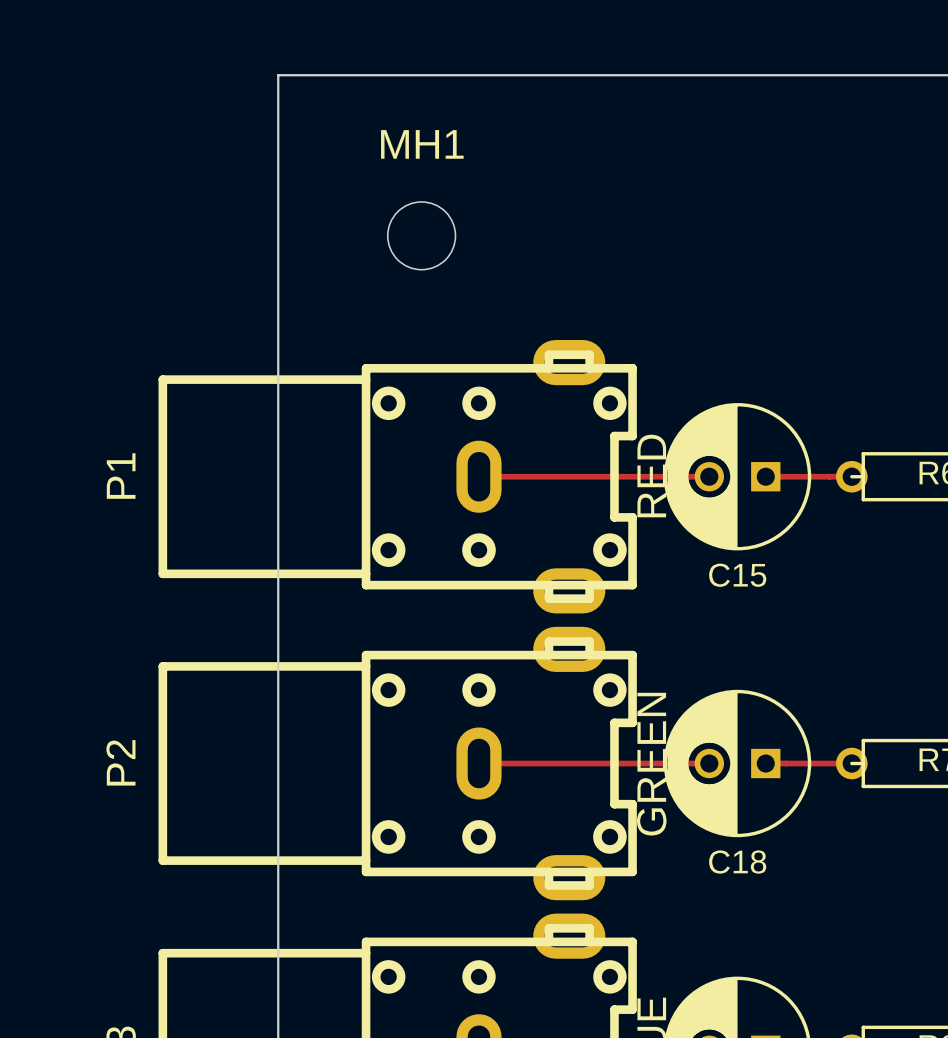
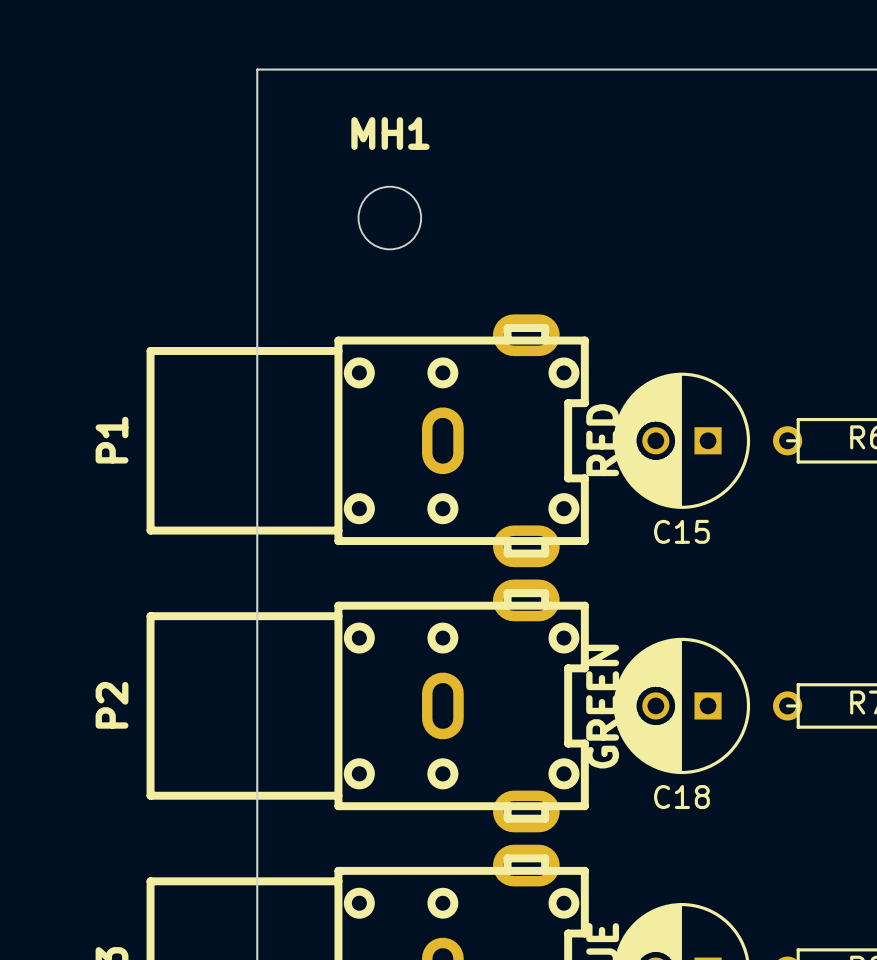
track: (478, 476) (709, 476) -> none
track: (765, 476) (851, 476) -> none
track: (478, 763) (709, 763) -> none
track: (765, 763) (851, 763) -> none

